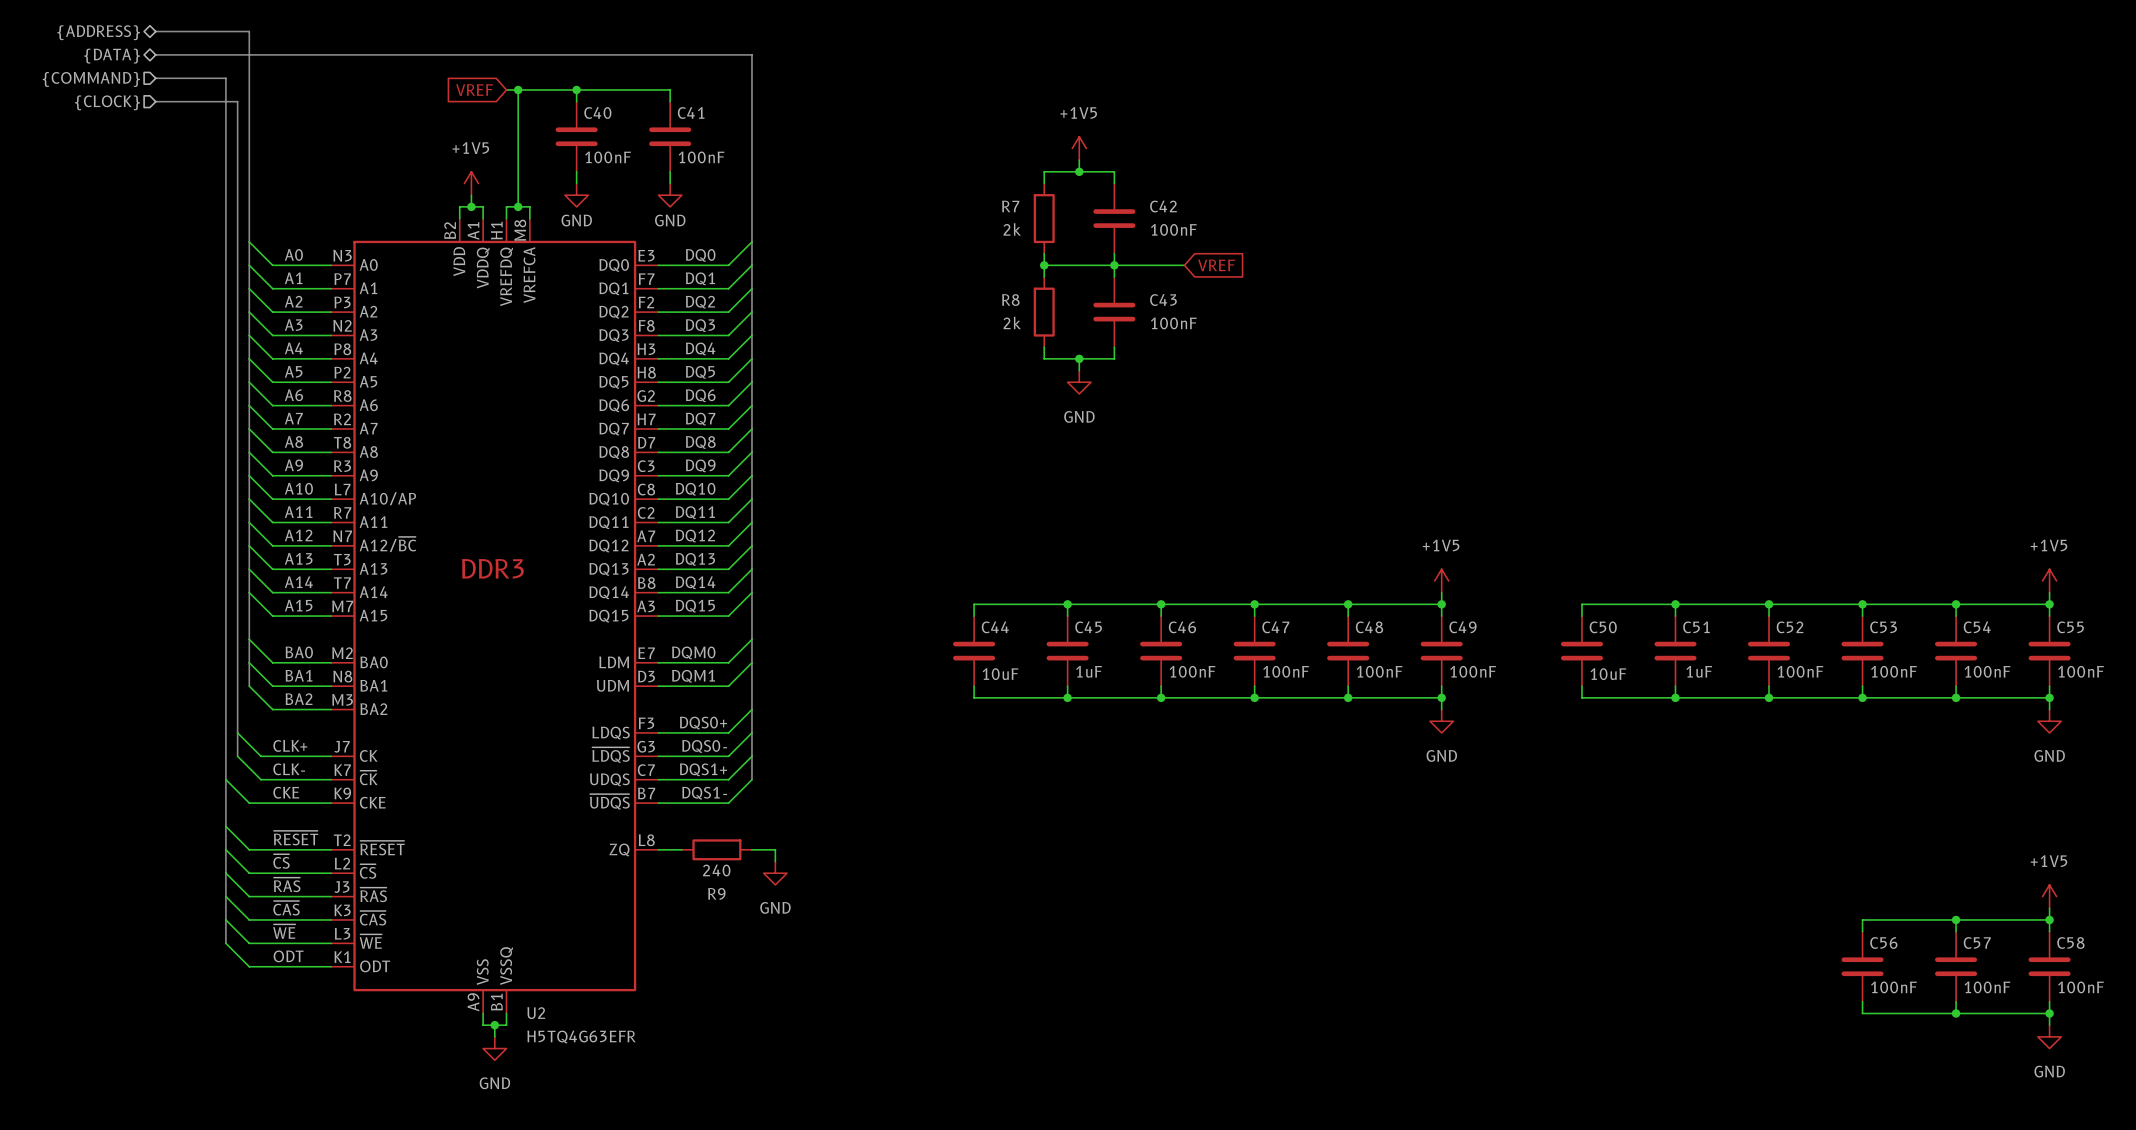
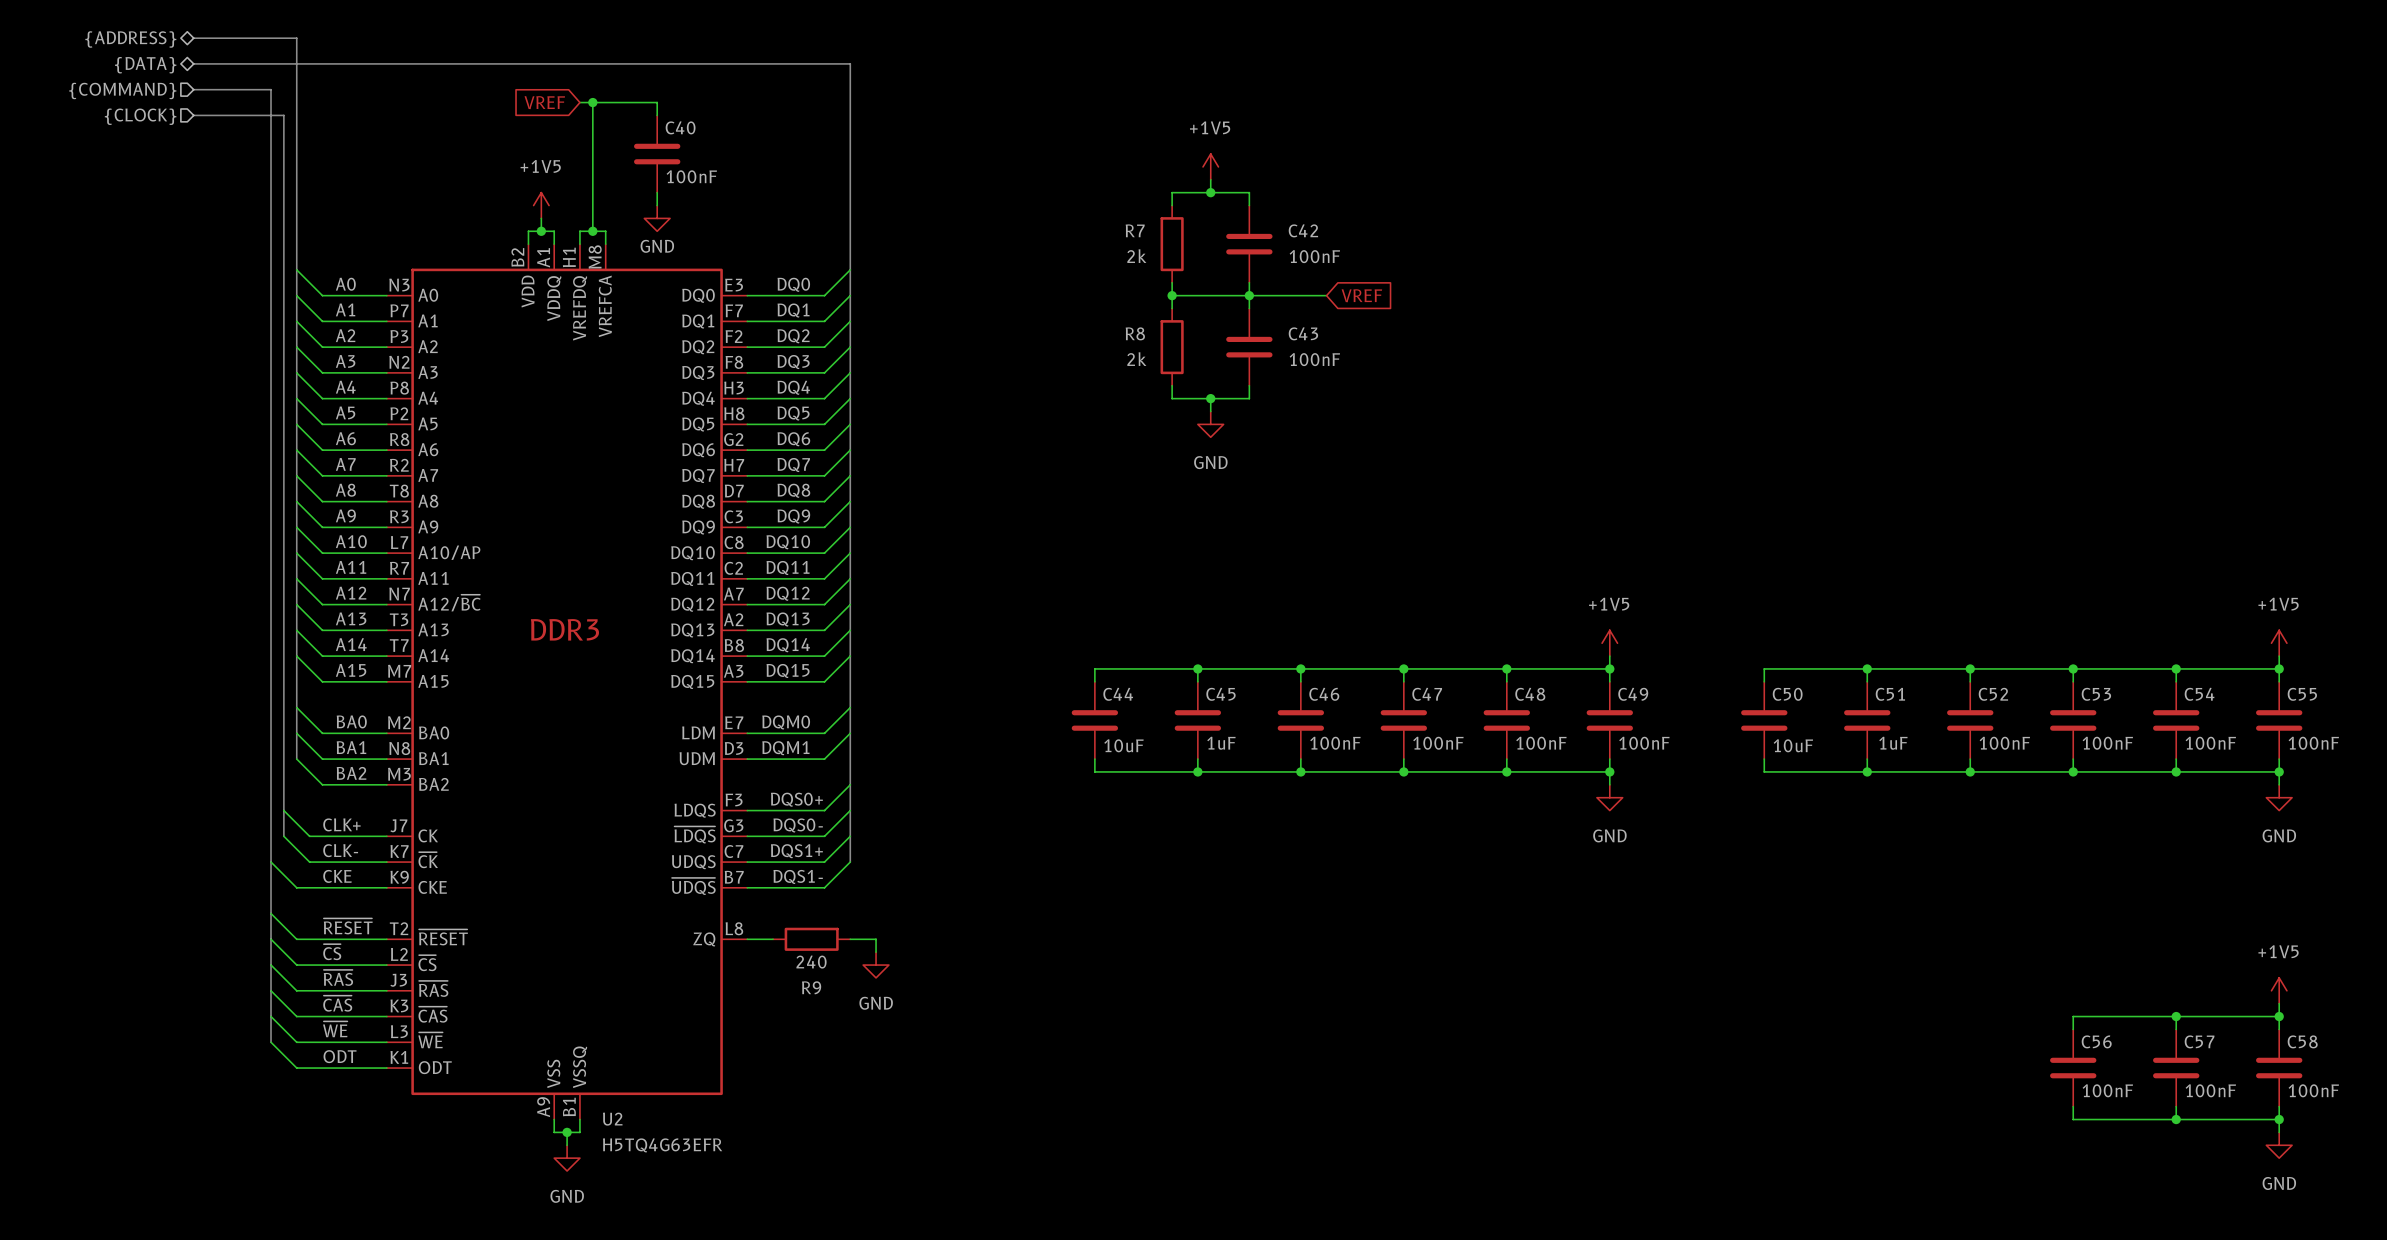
wire: (576, 89) (670, 89) (670, 101) -> none
junction: (576, 89) -> none
C41: 100nF (670, 136) -> none
wire: (670, 171) (670, 183) -> none
power symbol: GND (670, 195) -> none

